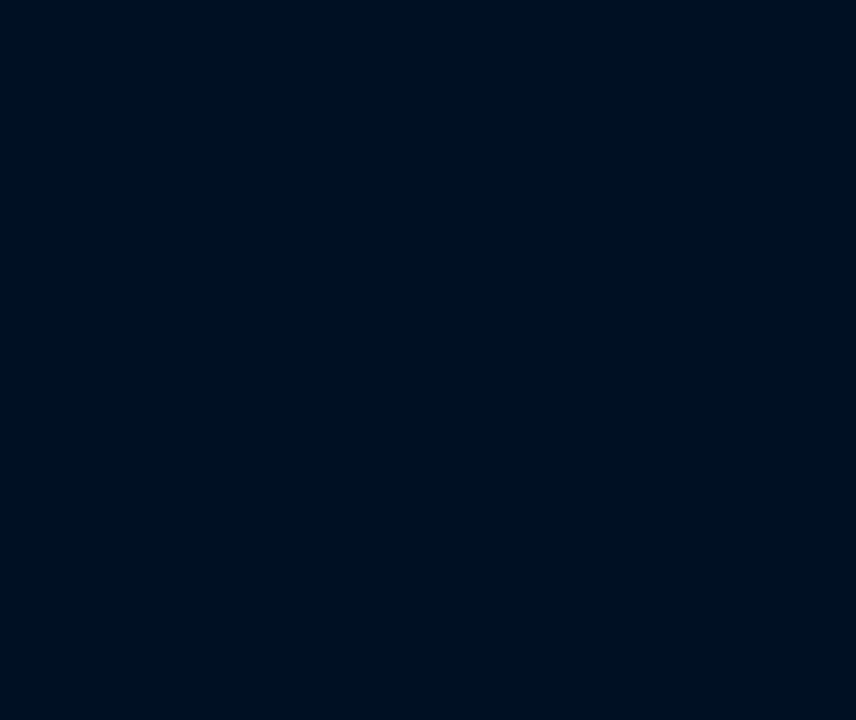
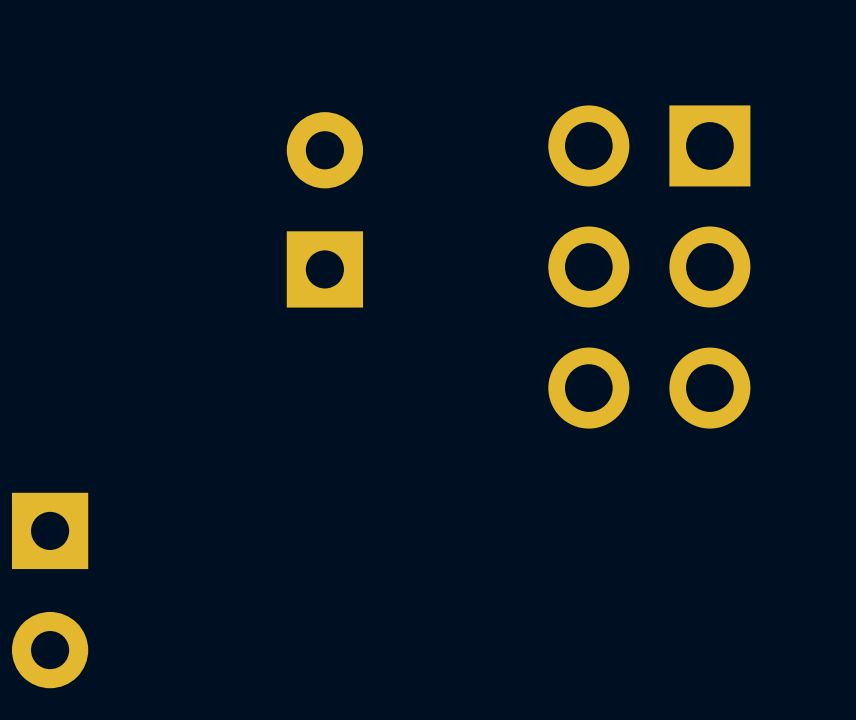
part: none -> (324, 209)
part: none -> (649, 267)
part: none -> (50, 590)

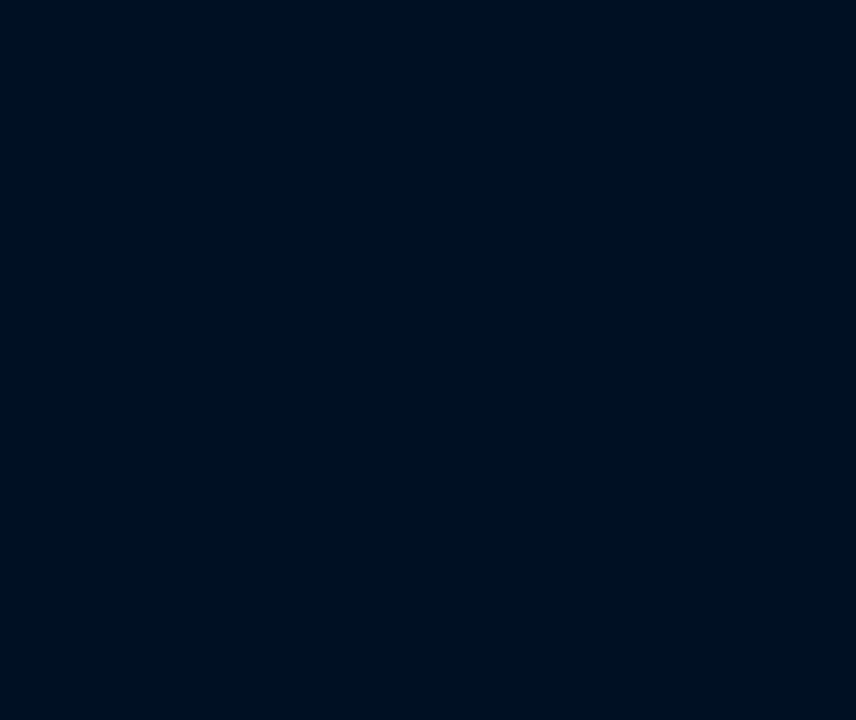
part: (324, 209) -> none
part: (649, 267) -> none
part: (50, 590) -> none

